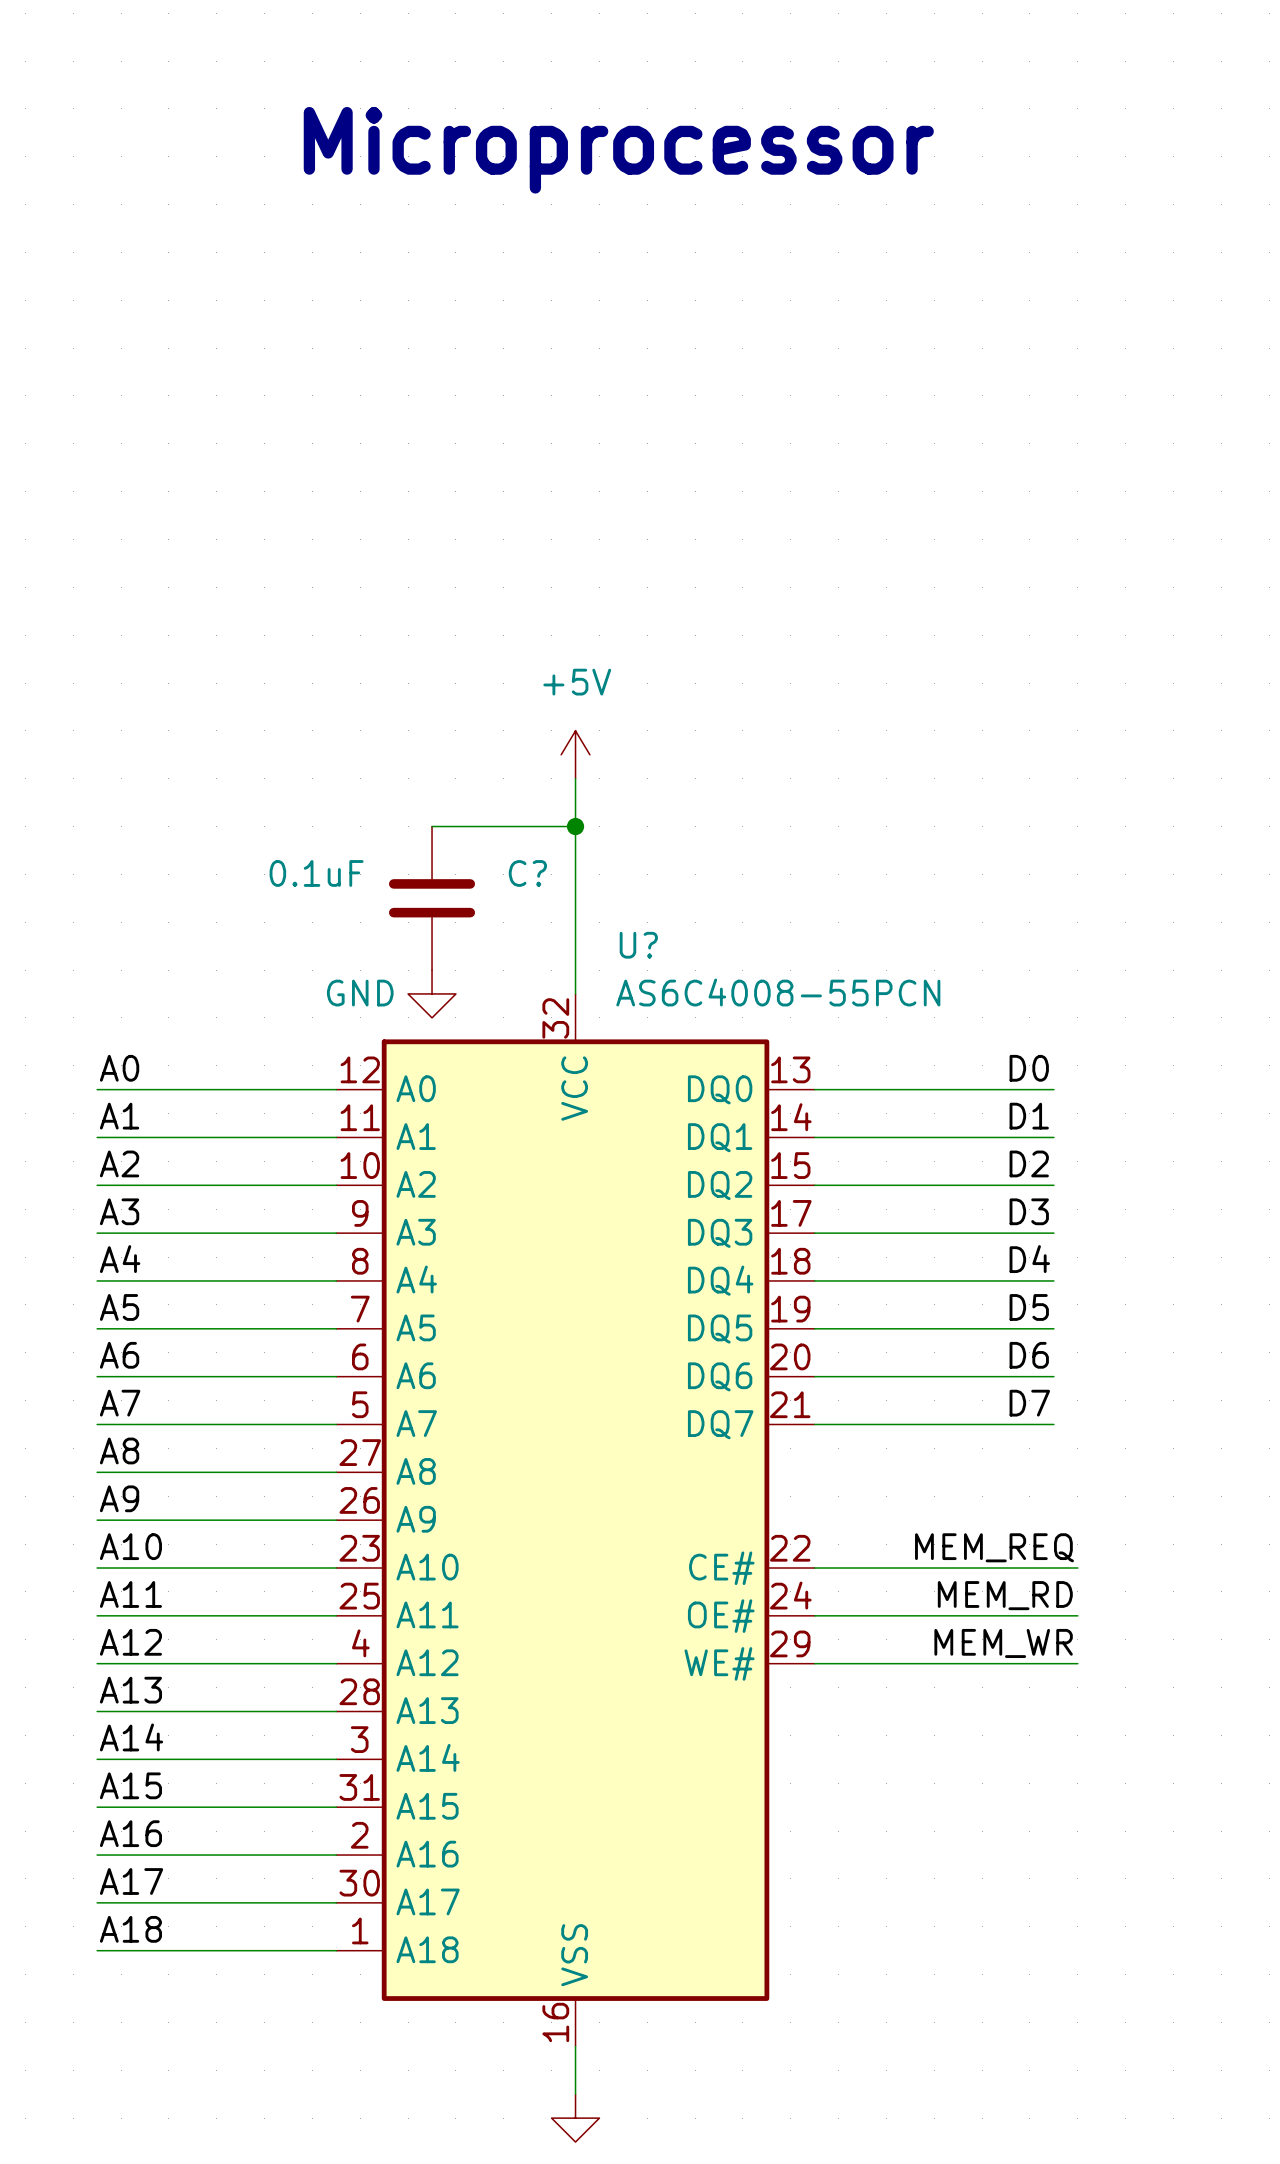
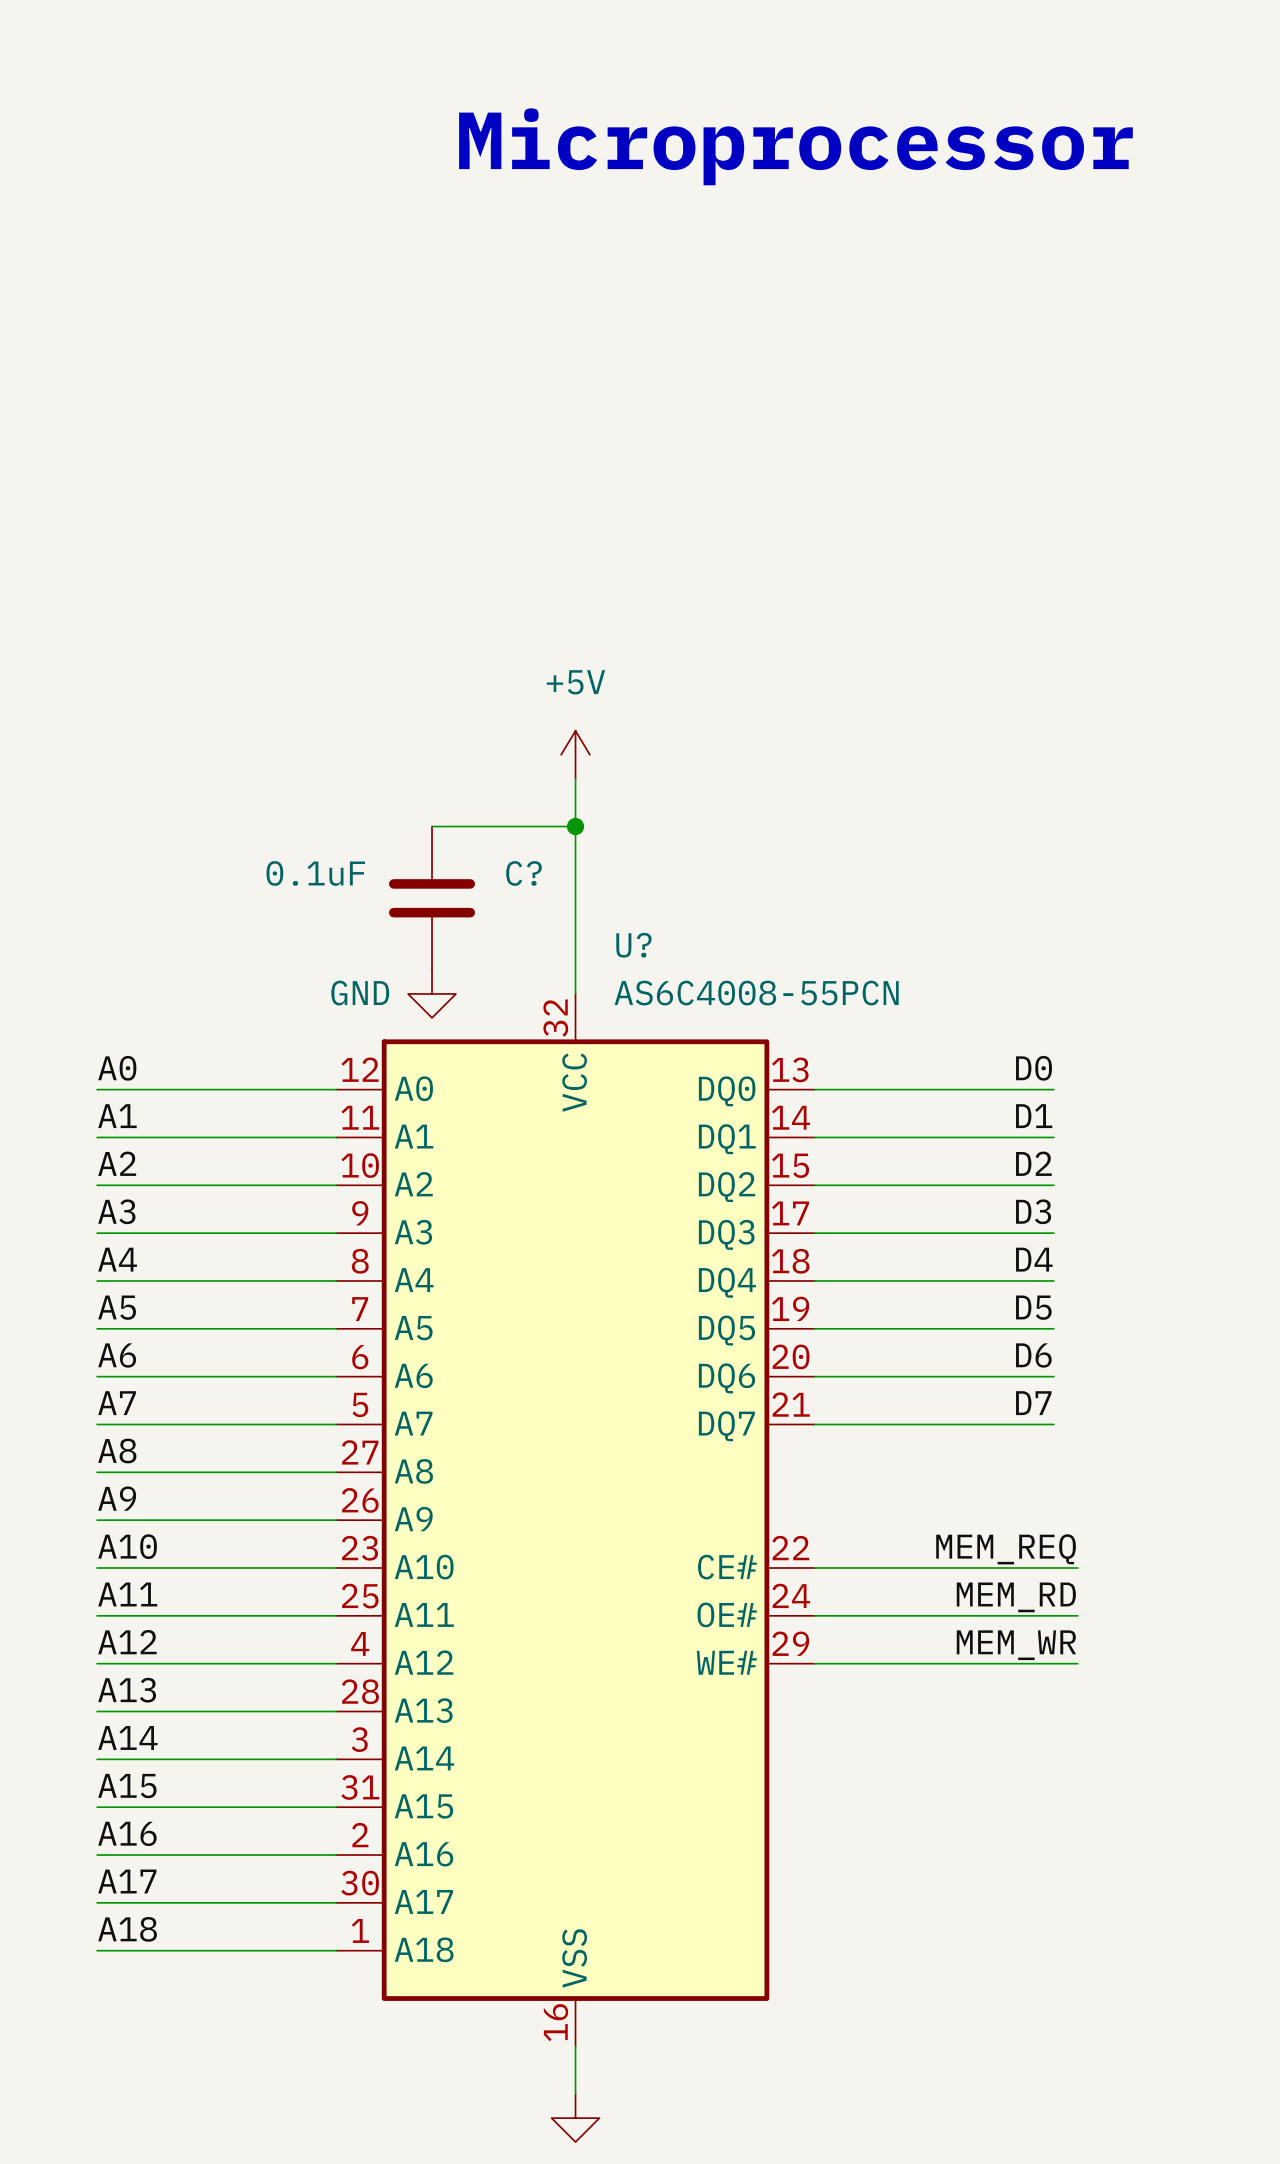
text position: Microprocessor (618, 150) -> Microprocessor (795, 146)

